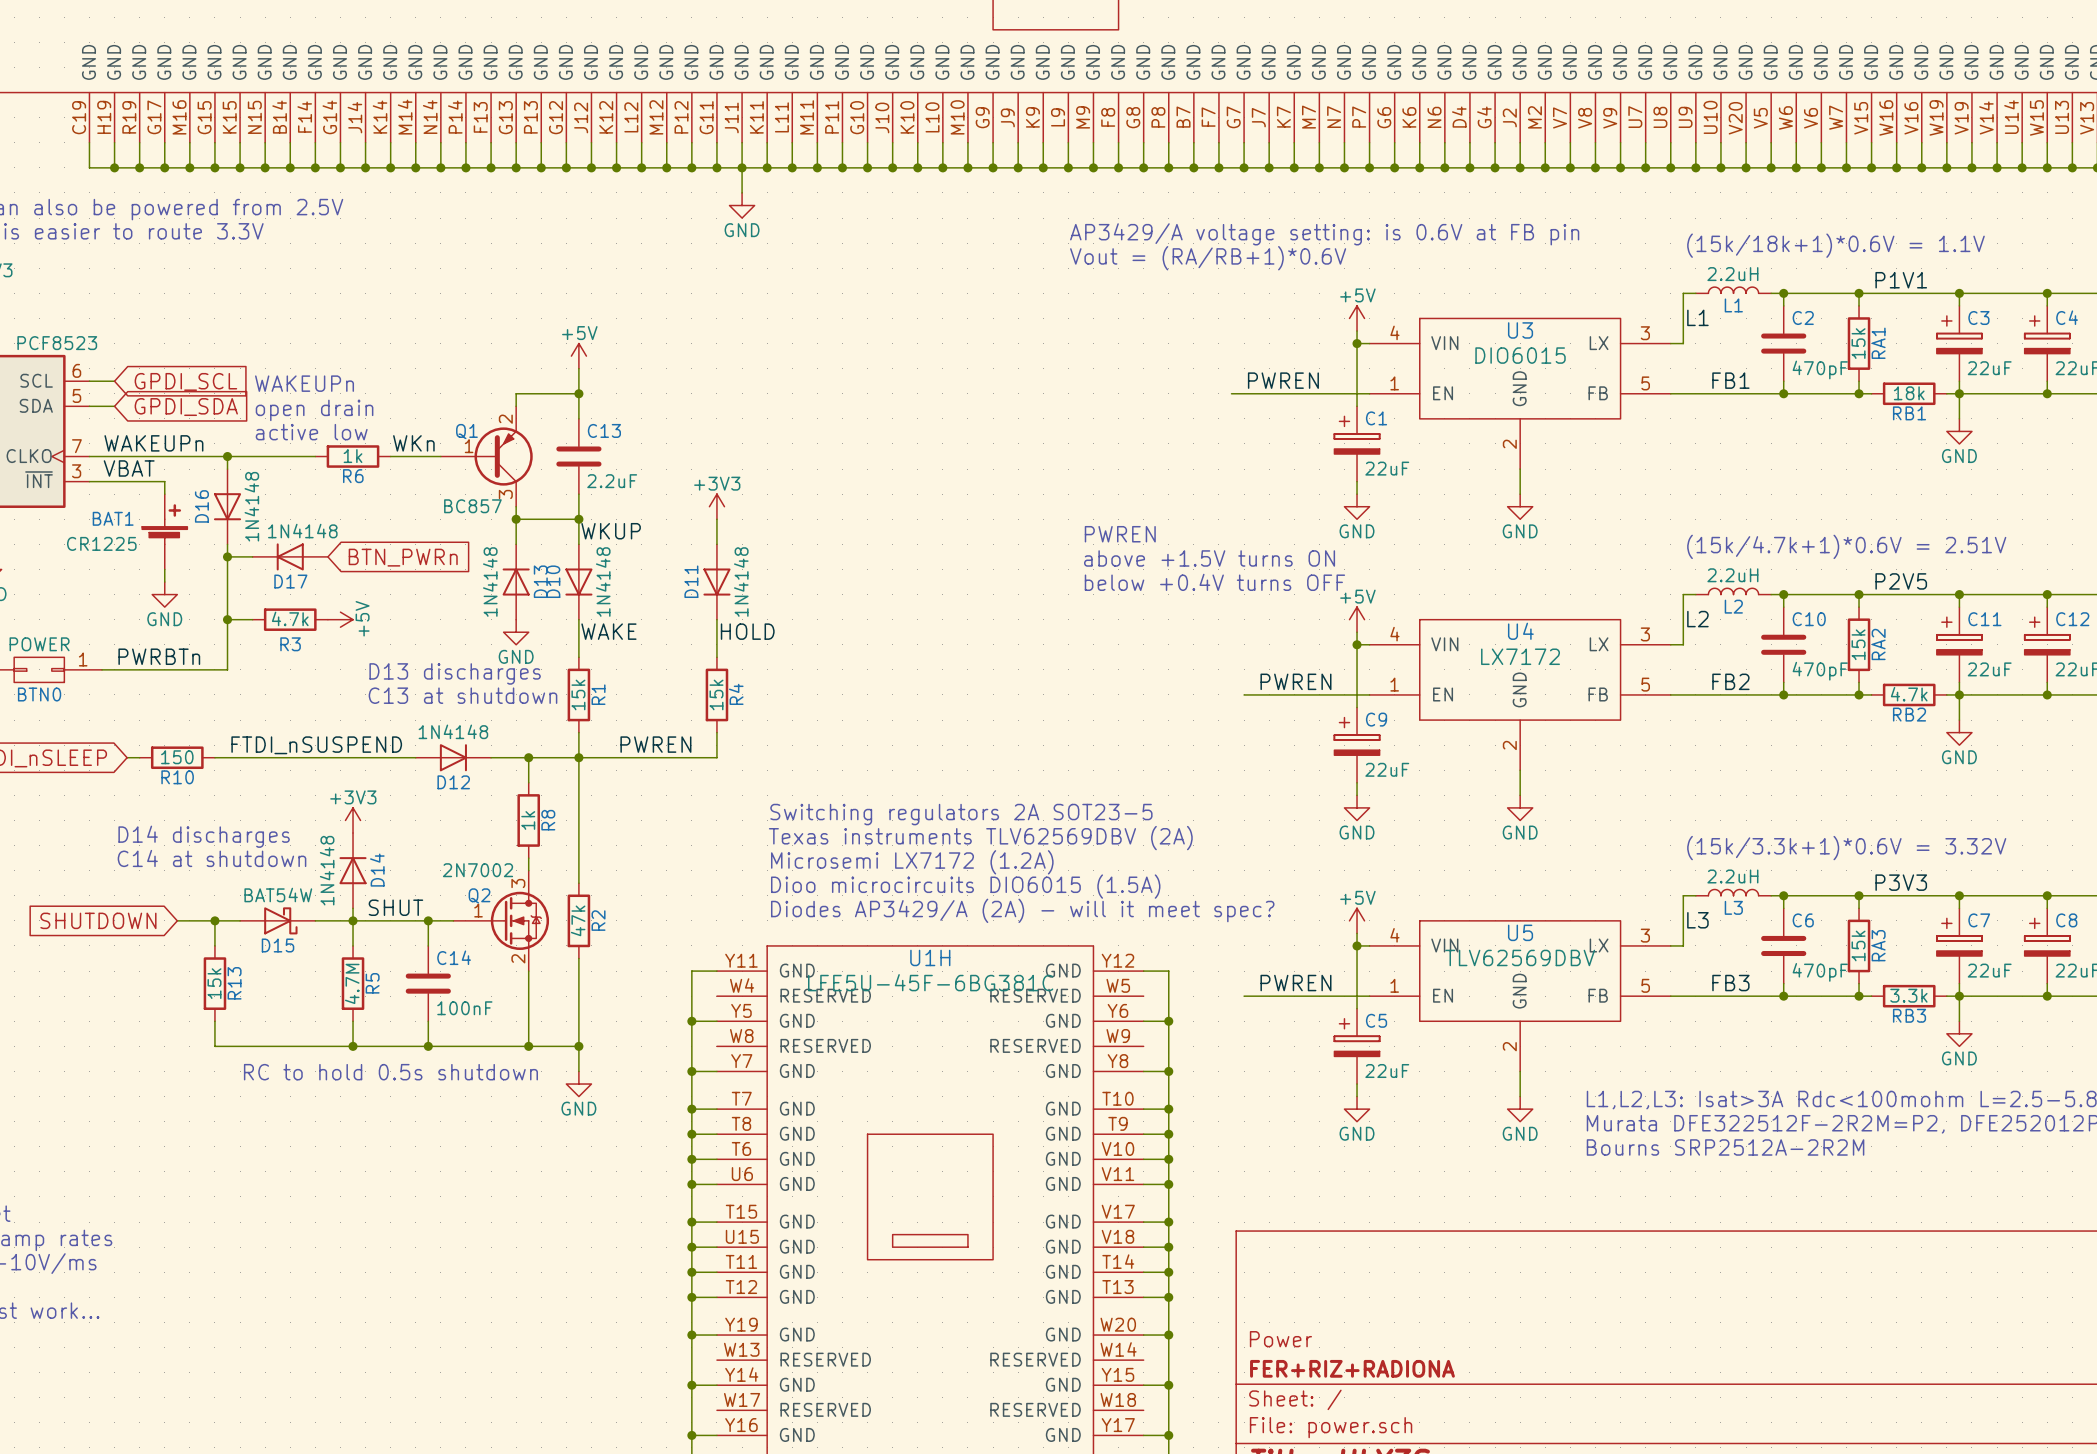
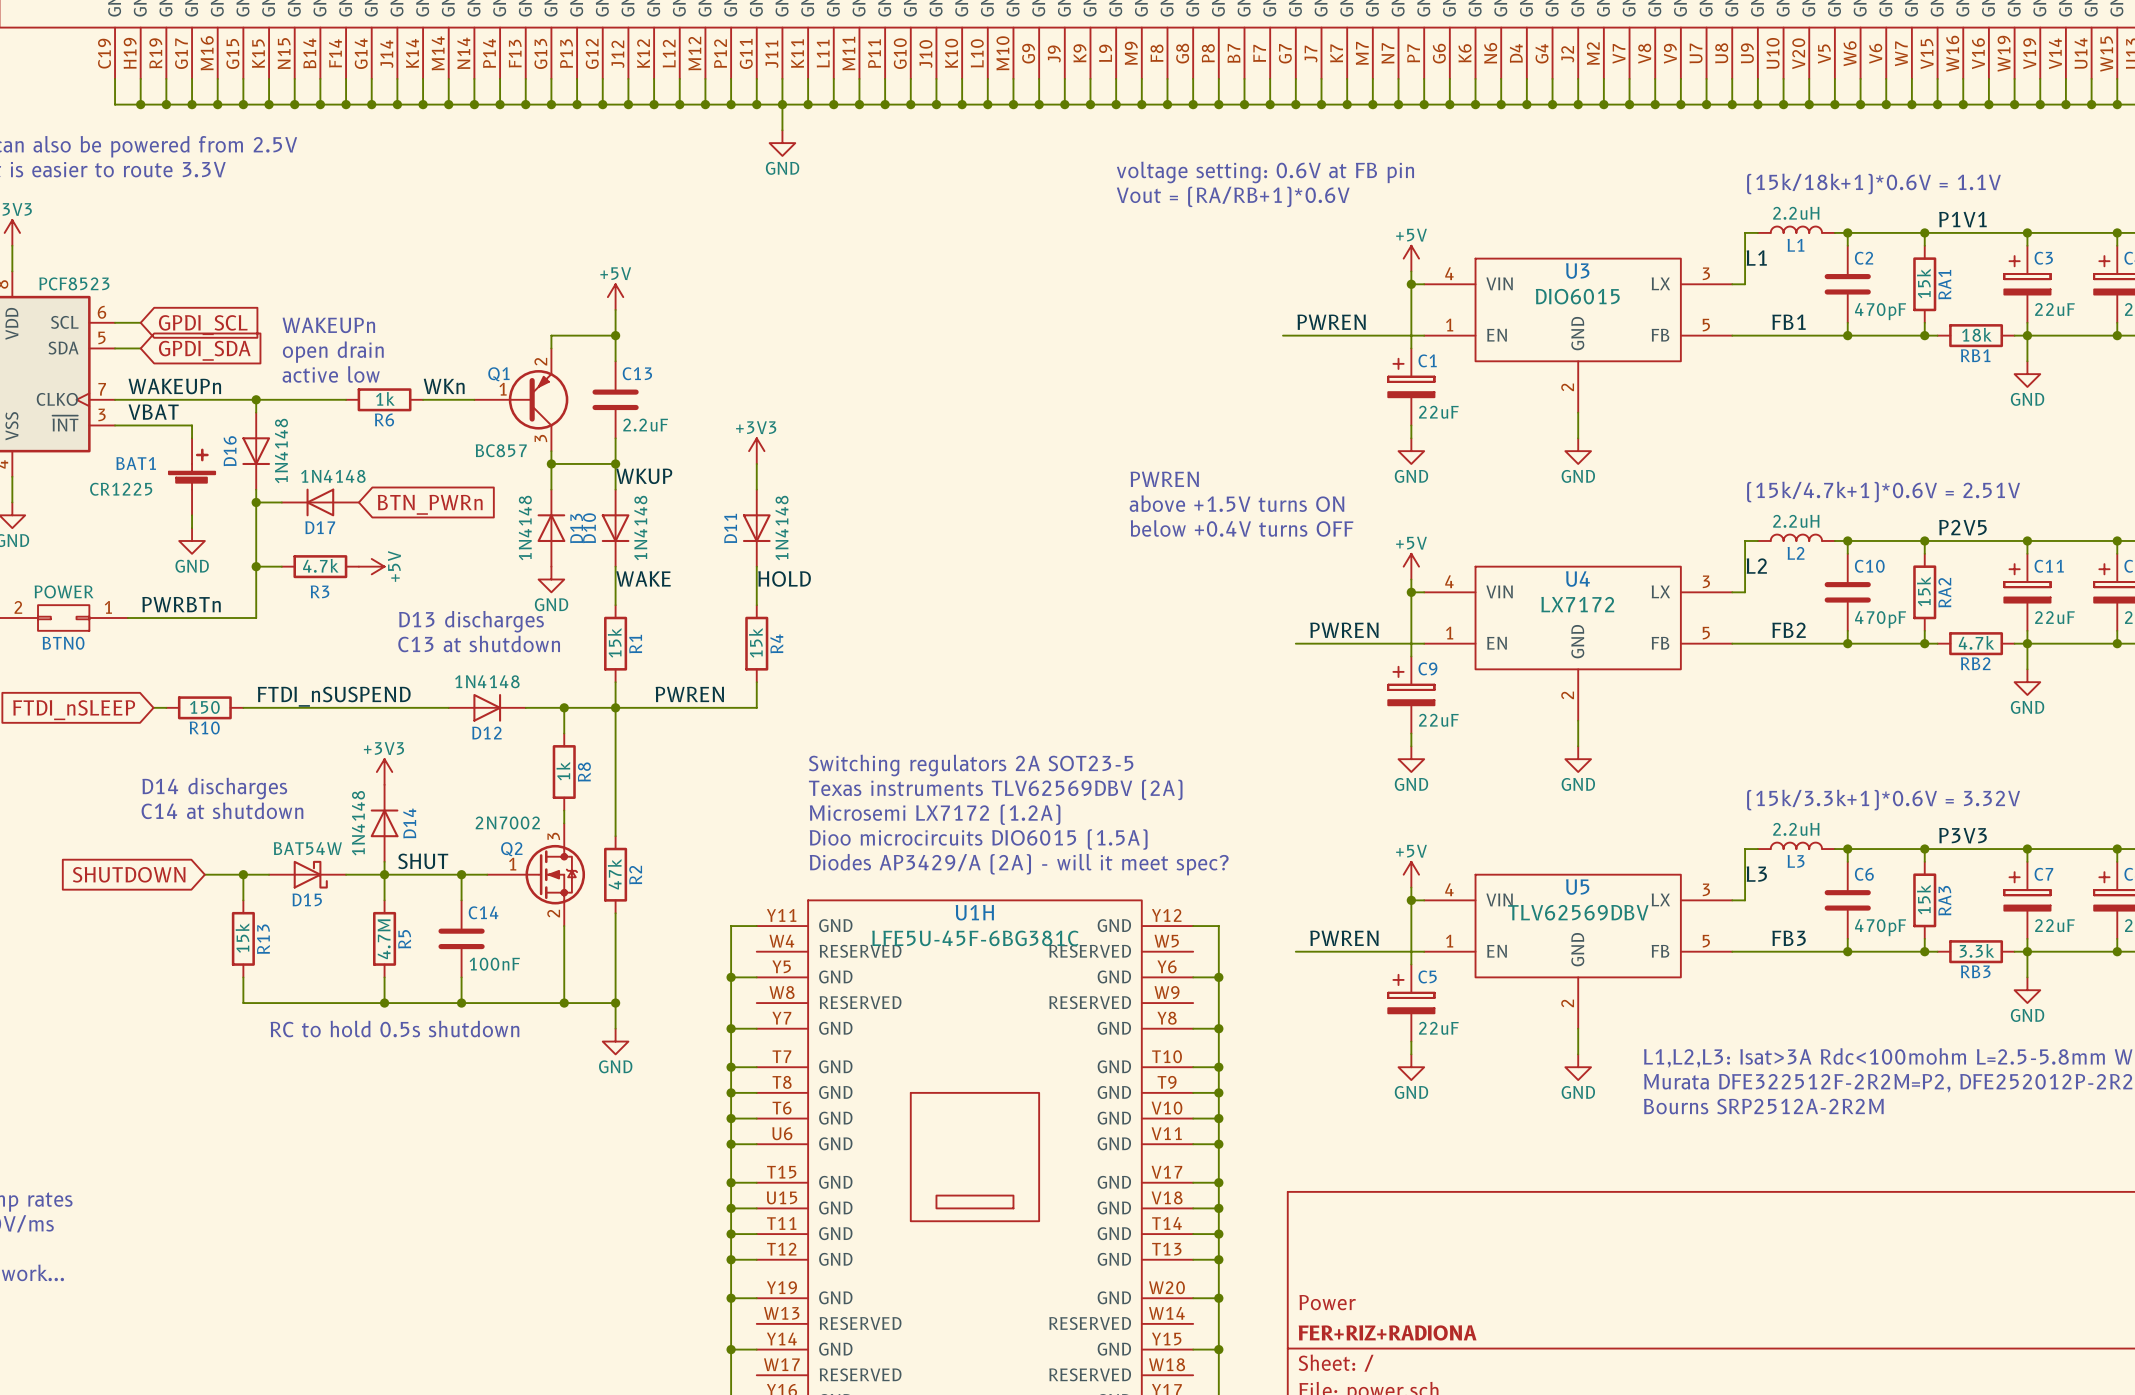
text: AP3429/A voltage setting: is 0.6V at FB pin (1324, 234) -> voltage setting: 0.6V at FB pin (1265, 172)

